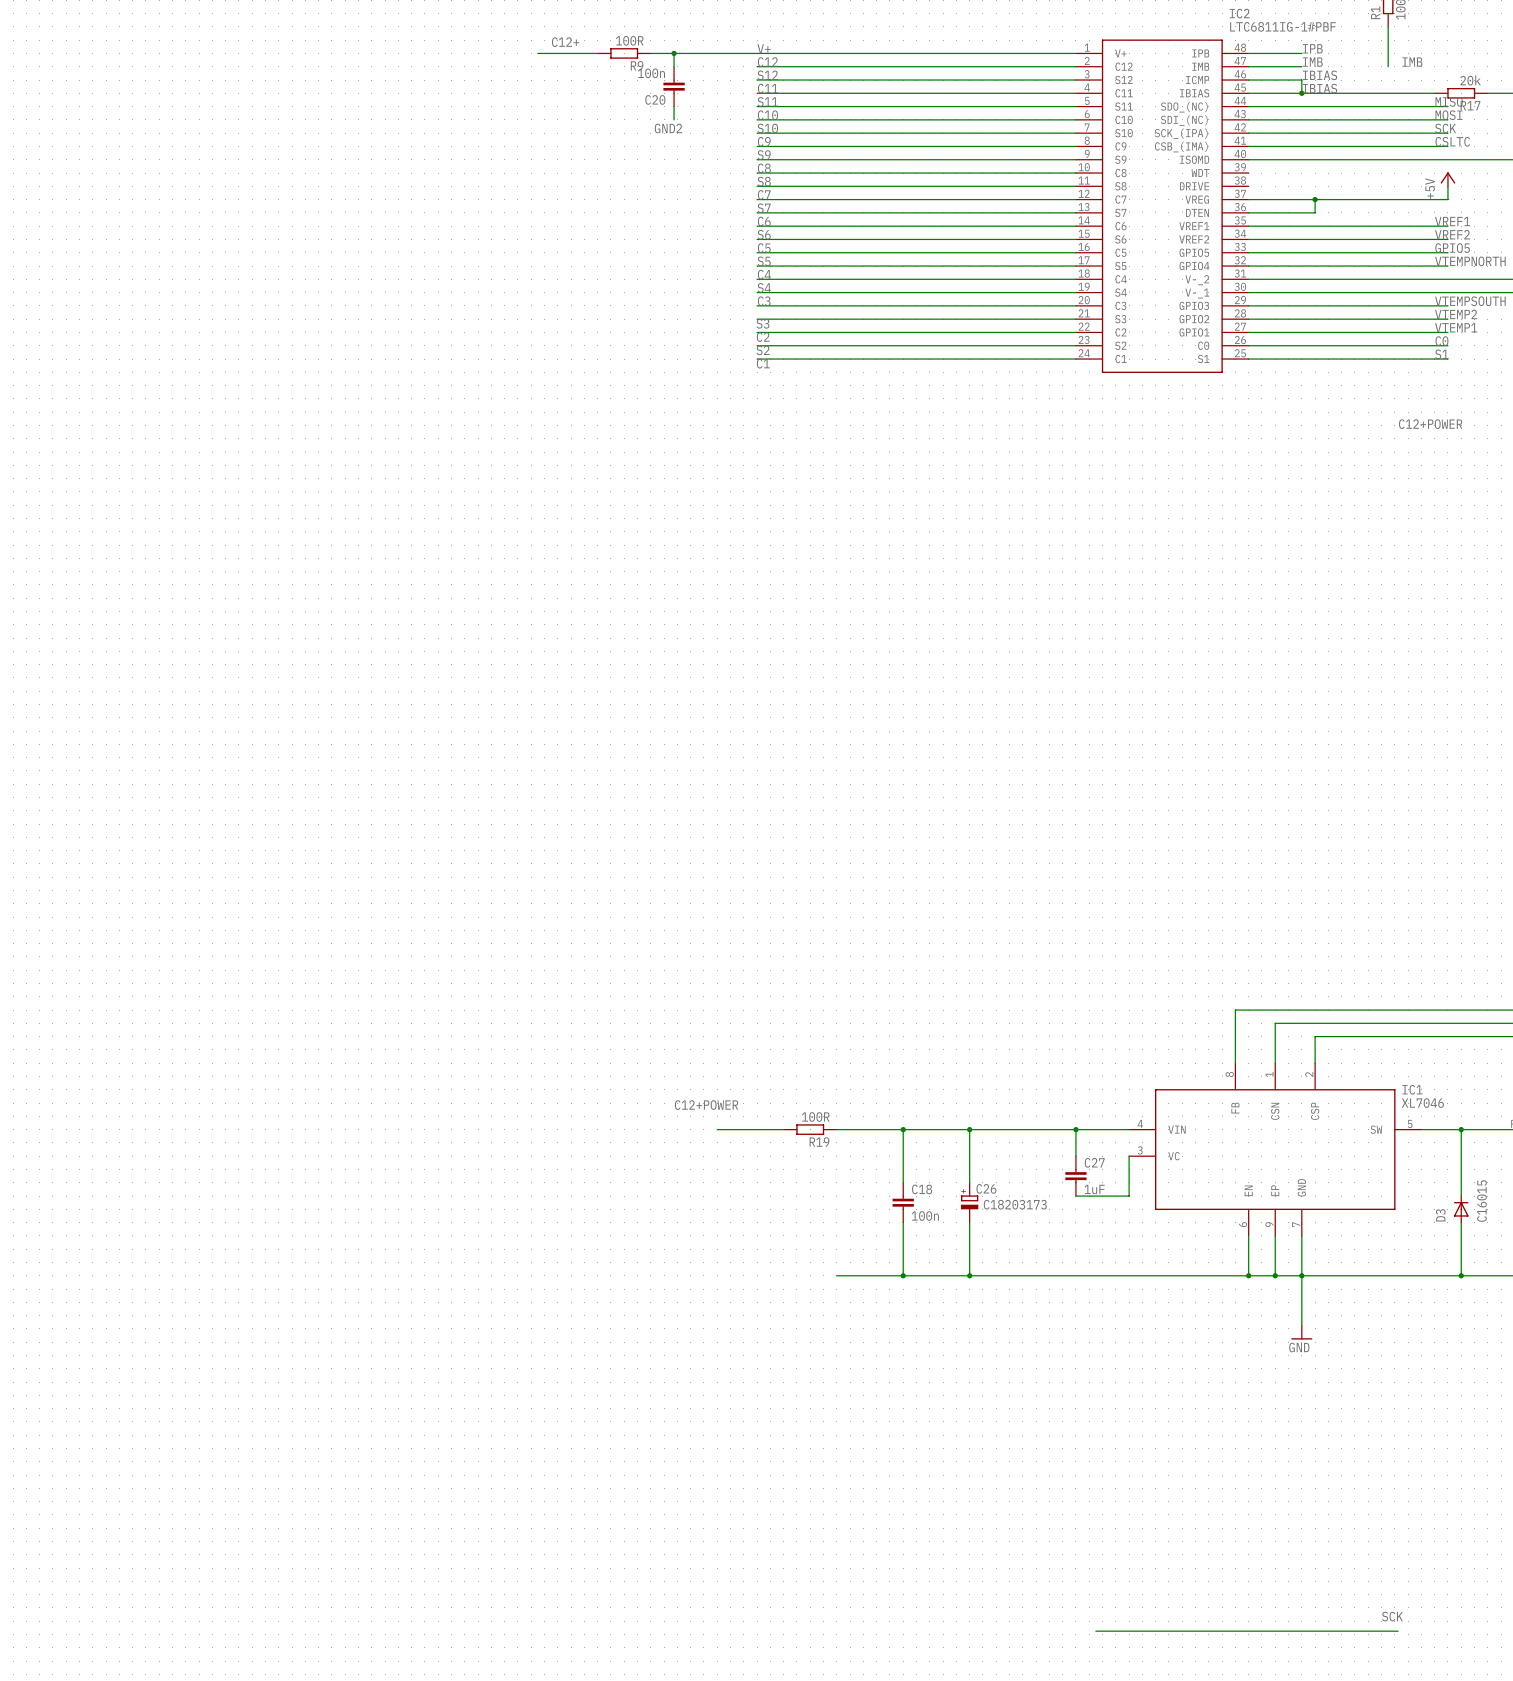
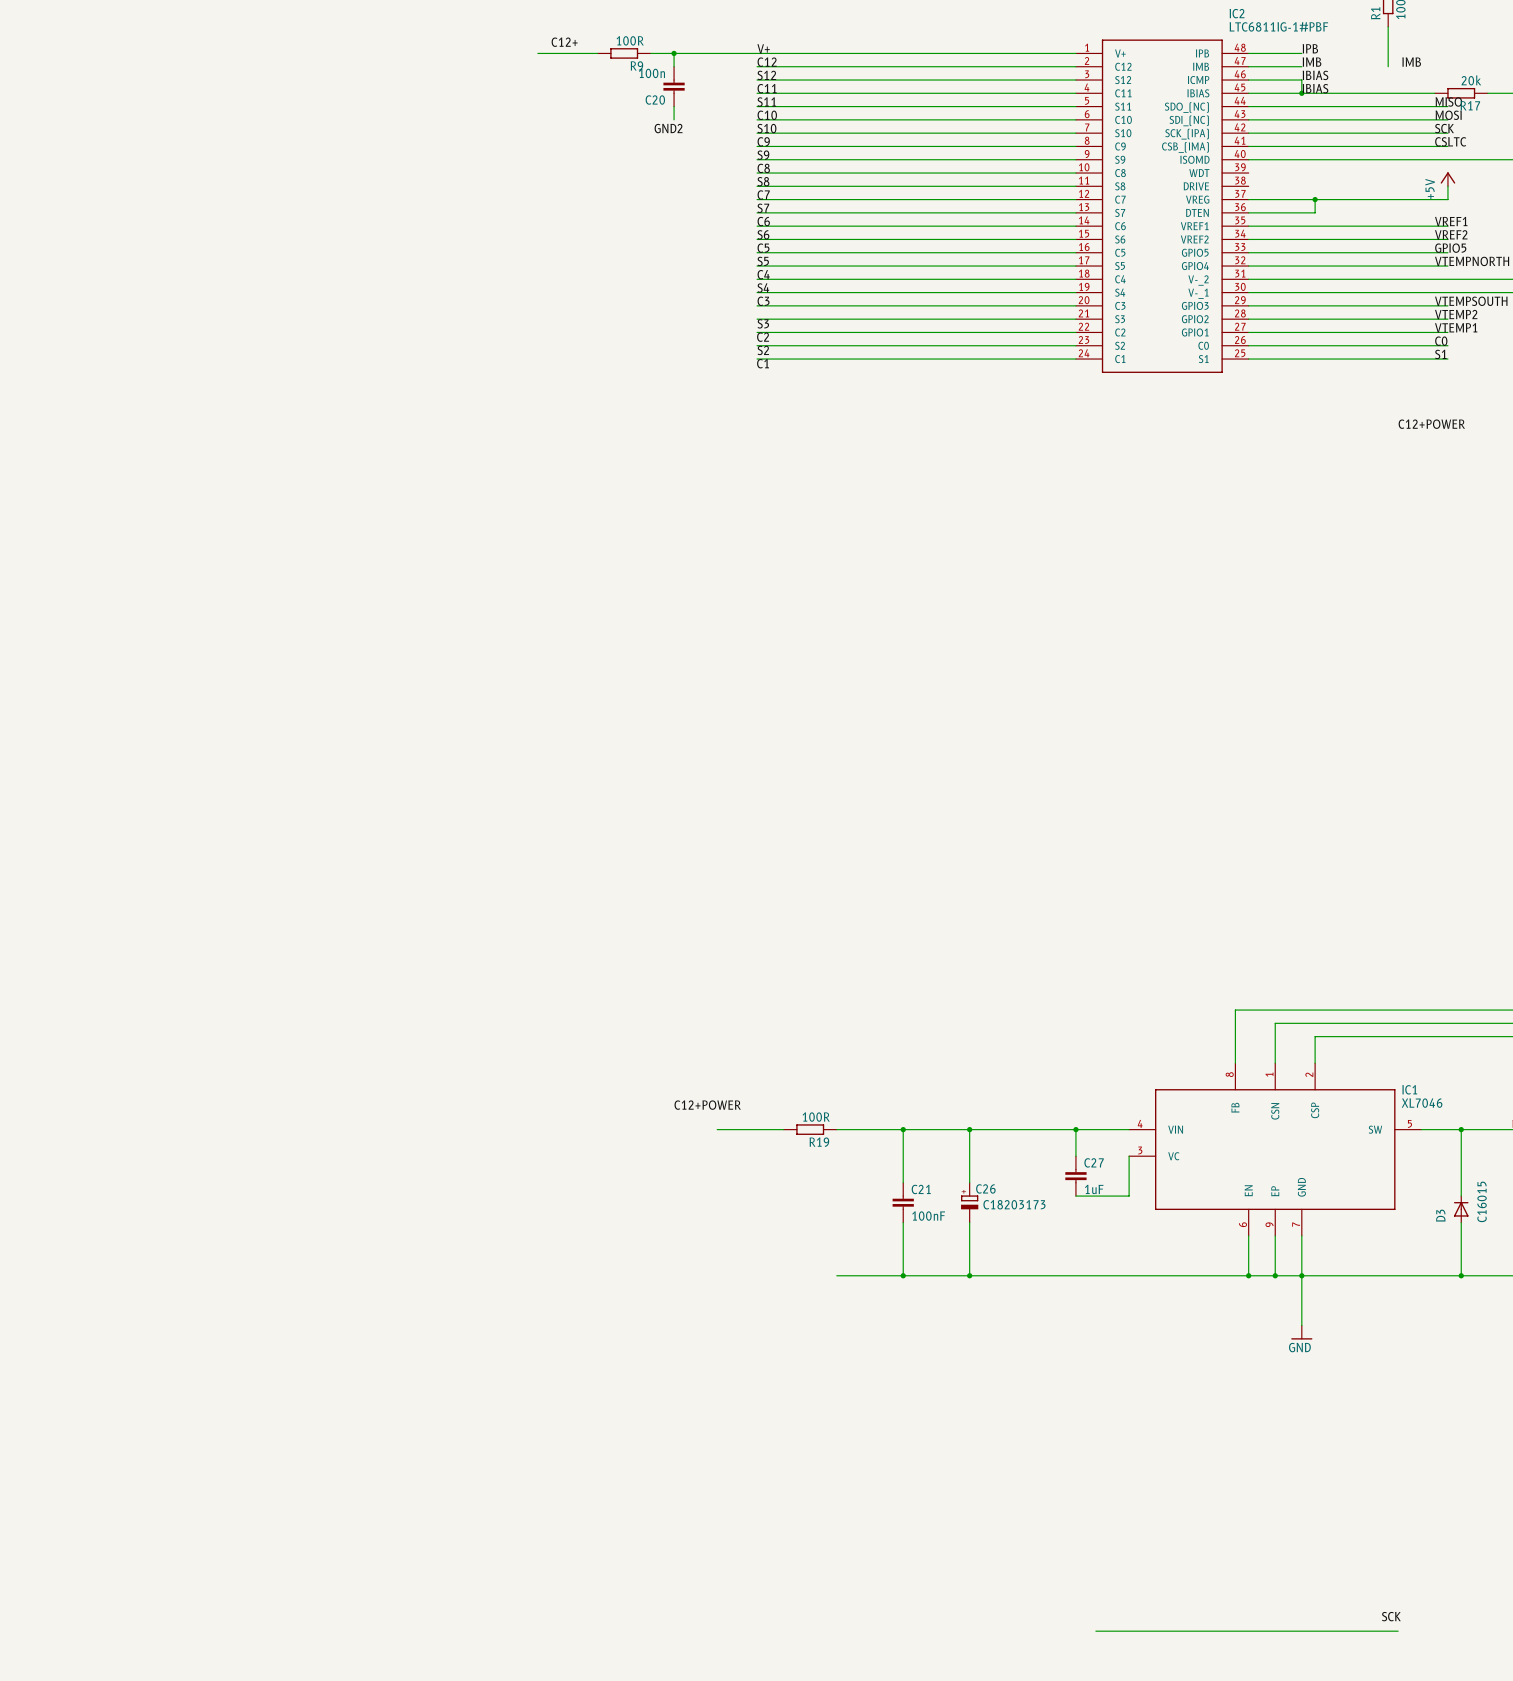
C18 name: C18 (922, 1189) -> C21 (921, 1189)
C18 value: 100n (925, 1215) -> 100nF (928, 1216)

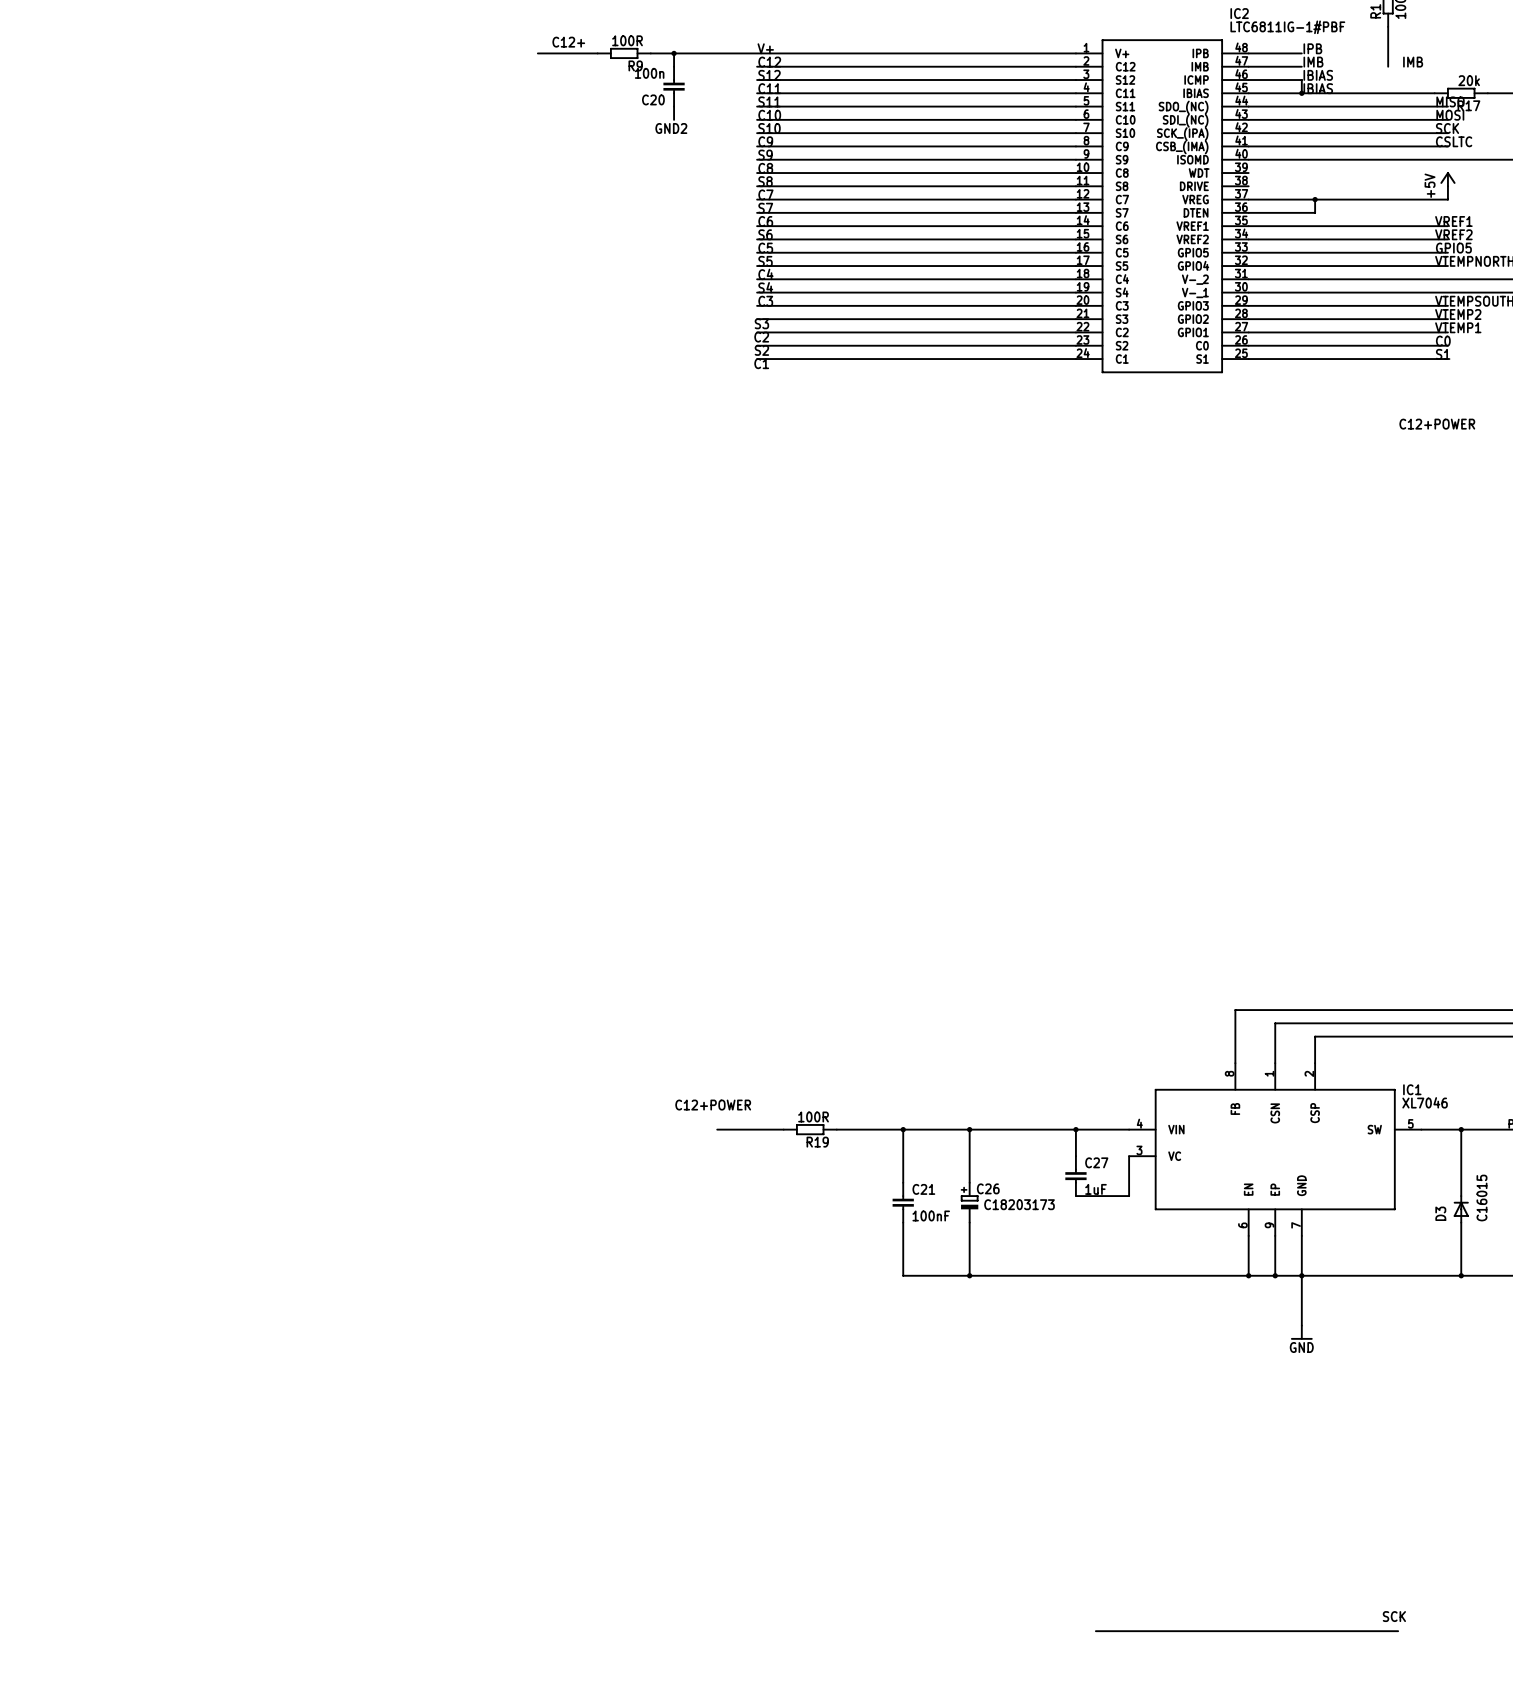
wire: (836, 1275) (903, 1275) -> none
junction: (903, 1275) -> none

